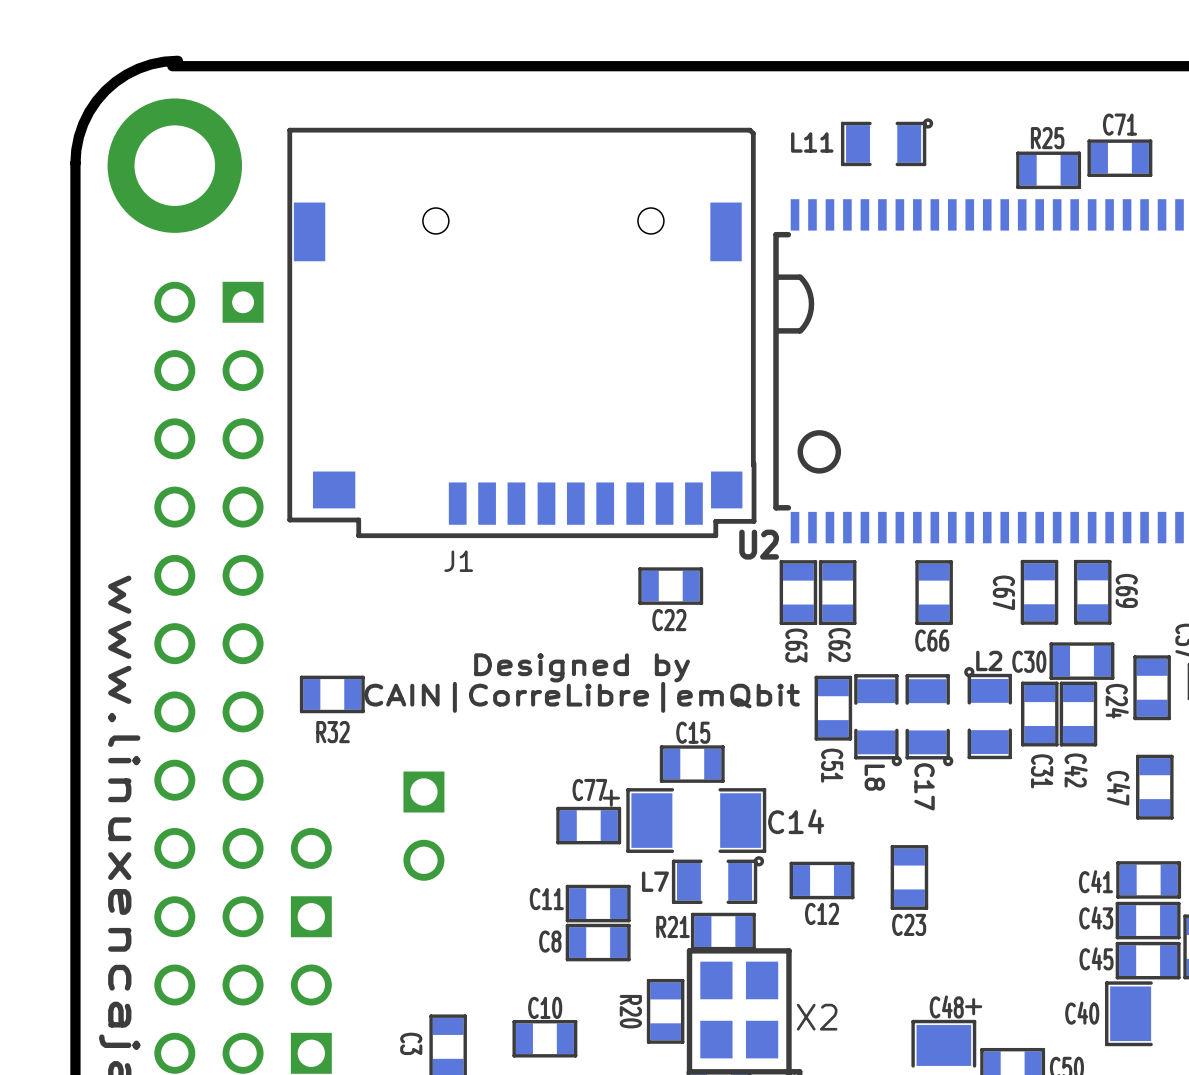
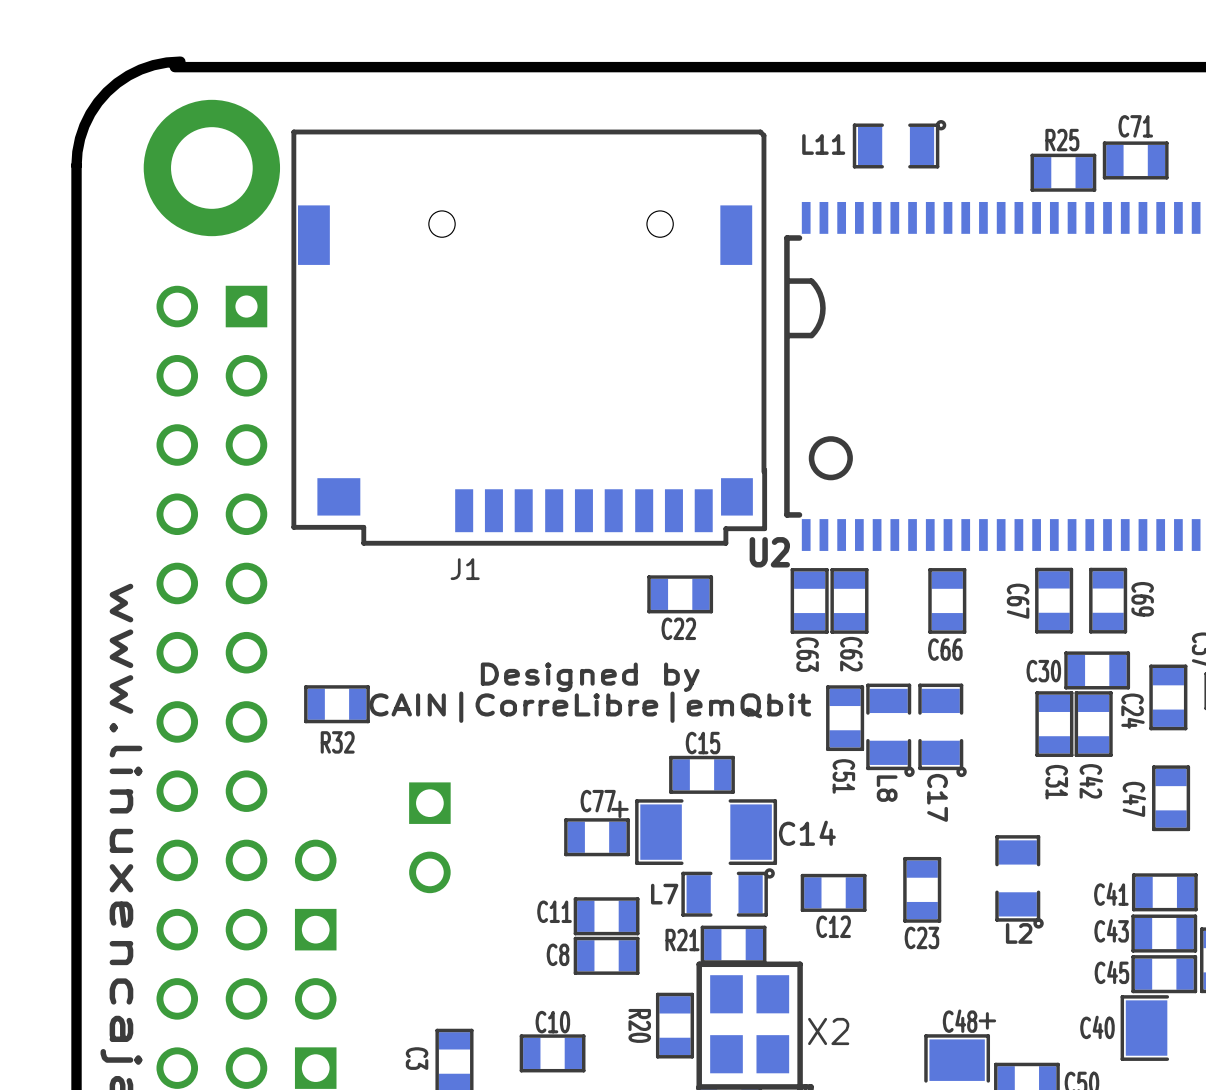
part position: (174, 165) -> (211, 168)
L2 rotation: 0° (988, 713) -> 180° (1019, 881)
L2 position: (988, 713) -> (1019, 881)

